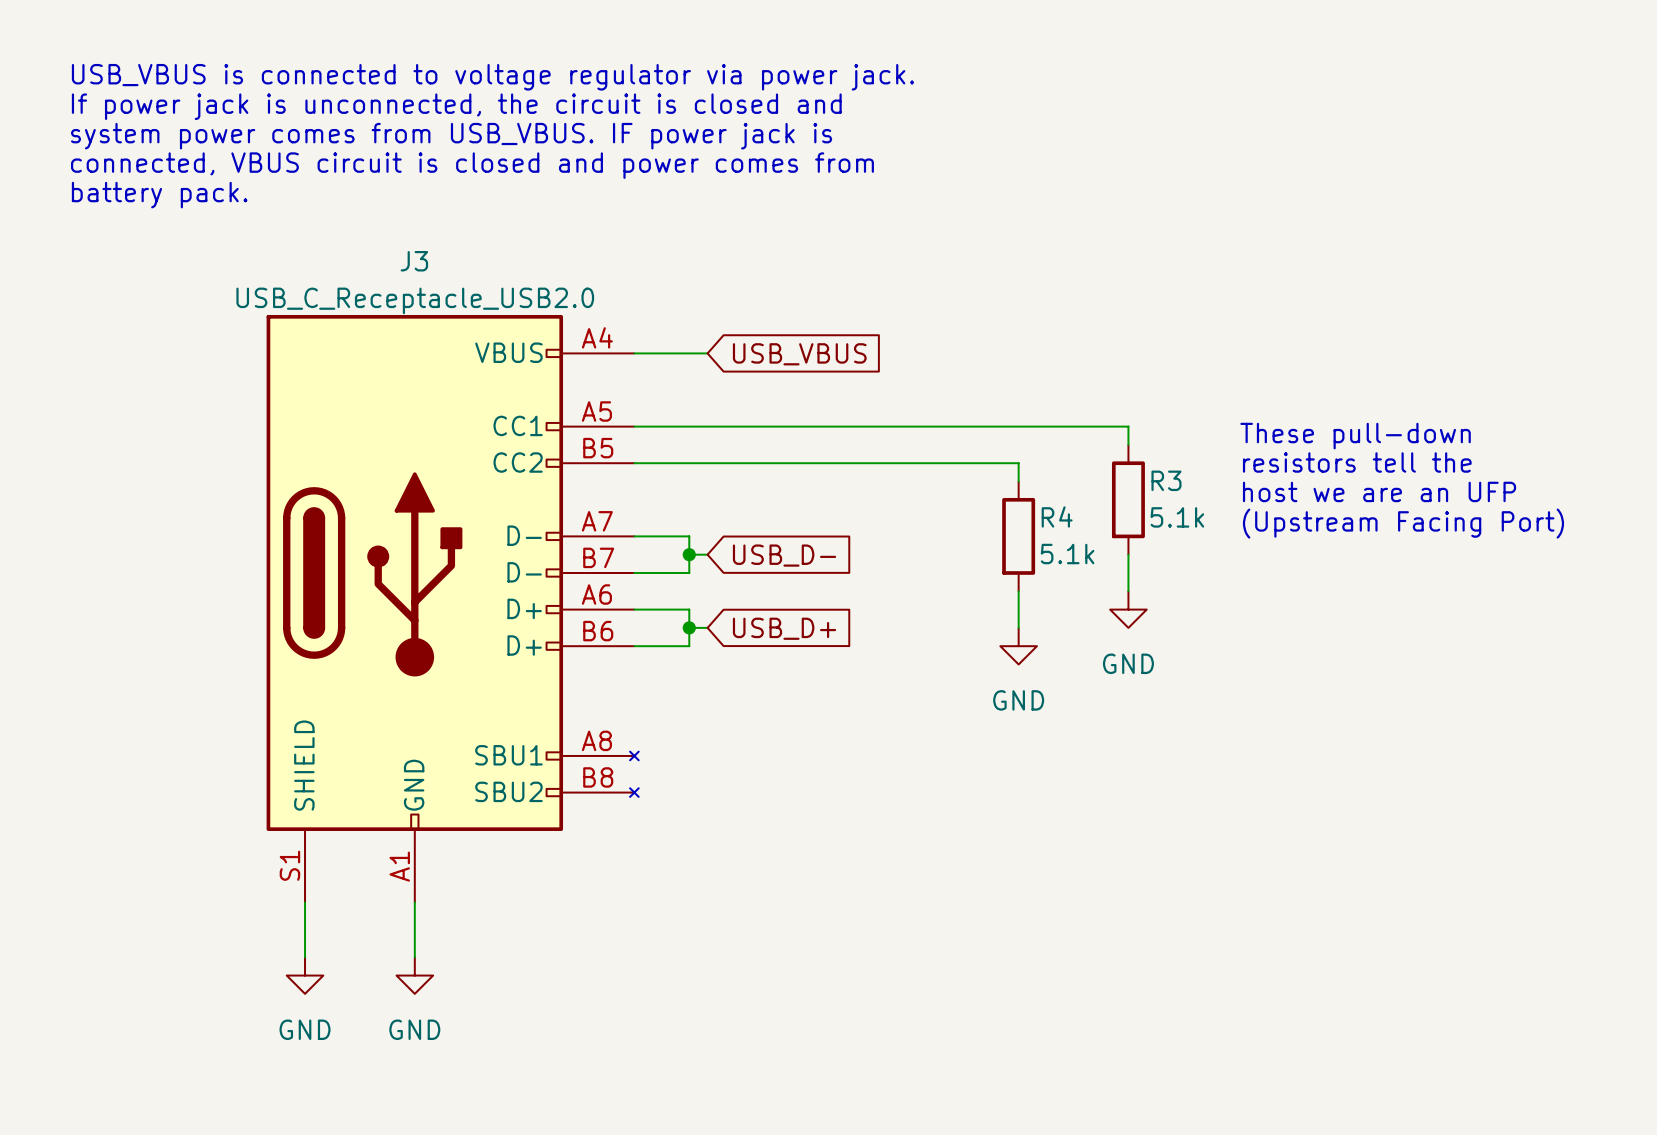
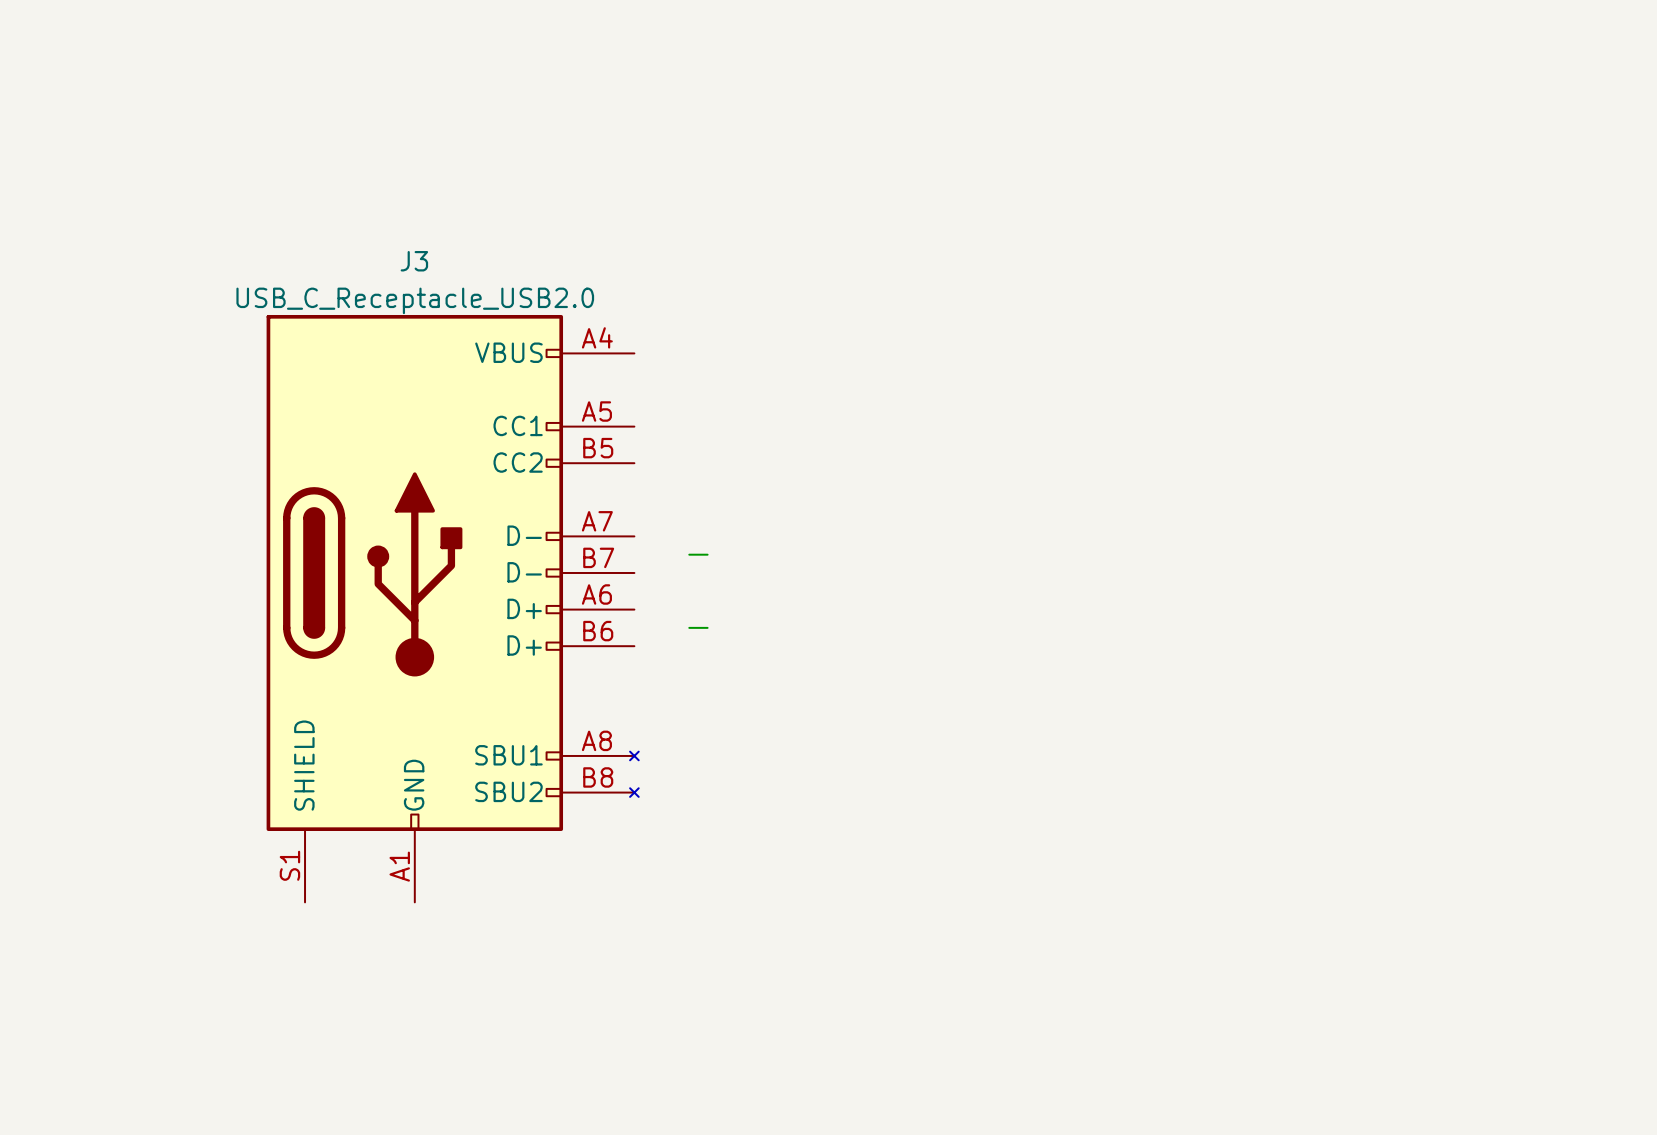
text: USB_VBUS is connected to voltage regulator via power jack. (492, 77) -> none
text: If power jack is unconnected, the circuit is closed and (456, 106) -> none
text: system power comes from USB_VBUS. IF power jack is (451, 136) -> none
text: connected, VBUS circuit is closed and power comes from (472, 165) -> none
text: battery pack. (159, 195) -> none
wire: (634, 353) (707, 353) -> none
global label: USB_VBUS (799, 354) -> none
wire: (634, 426) (1128, 426) (1128, 444) -> none
text: These pull-down (1355, 436) -> none
text: resistors tell the (1357, 462) -> none
wire: (634, 463) (1018, 463) (1018, 481) -> none
text: host we are an UFP (1379, 491) -> none
R3: 5.1k (1128, 499) -> none
text: (Upstream Facing Port) (1403, 523) -> none
wire: (634, 536) (689, 536) (689, 572) (634, 572) -> none
R4: 5.1k (1018, 536) -> none
junction: (689, 554) -> none
wire: (1128, 554) (1128, 591) -> none
global label: USB_D- (784, 555) -> none
wire: (1018, 591) (1018, 627) -> none
wire: (634, 609) (689, 609) (689, 646) (634, 646) -> none
power symbol: GND (1128, 609) -> none
junction: (689, 627) -> none
global label: USB_D+ (784, 628) -> none
power symbol: GND (1018, 646) -> none
wire: (305, 902) (305, 957) -> none
wire: (414, 902) (414, 957) -> none
power symbol: GND (305, 975) -> none
power symbol: GND (414, 975) -> none

